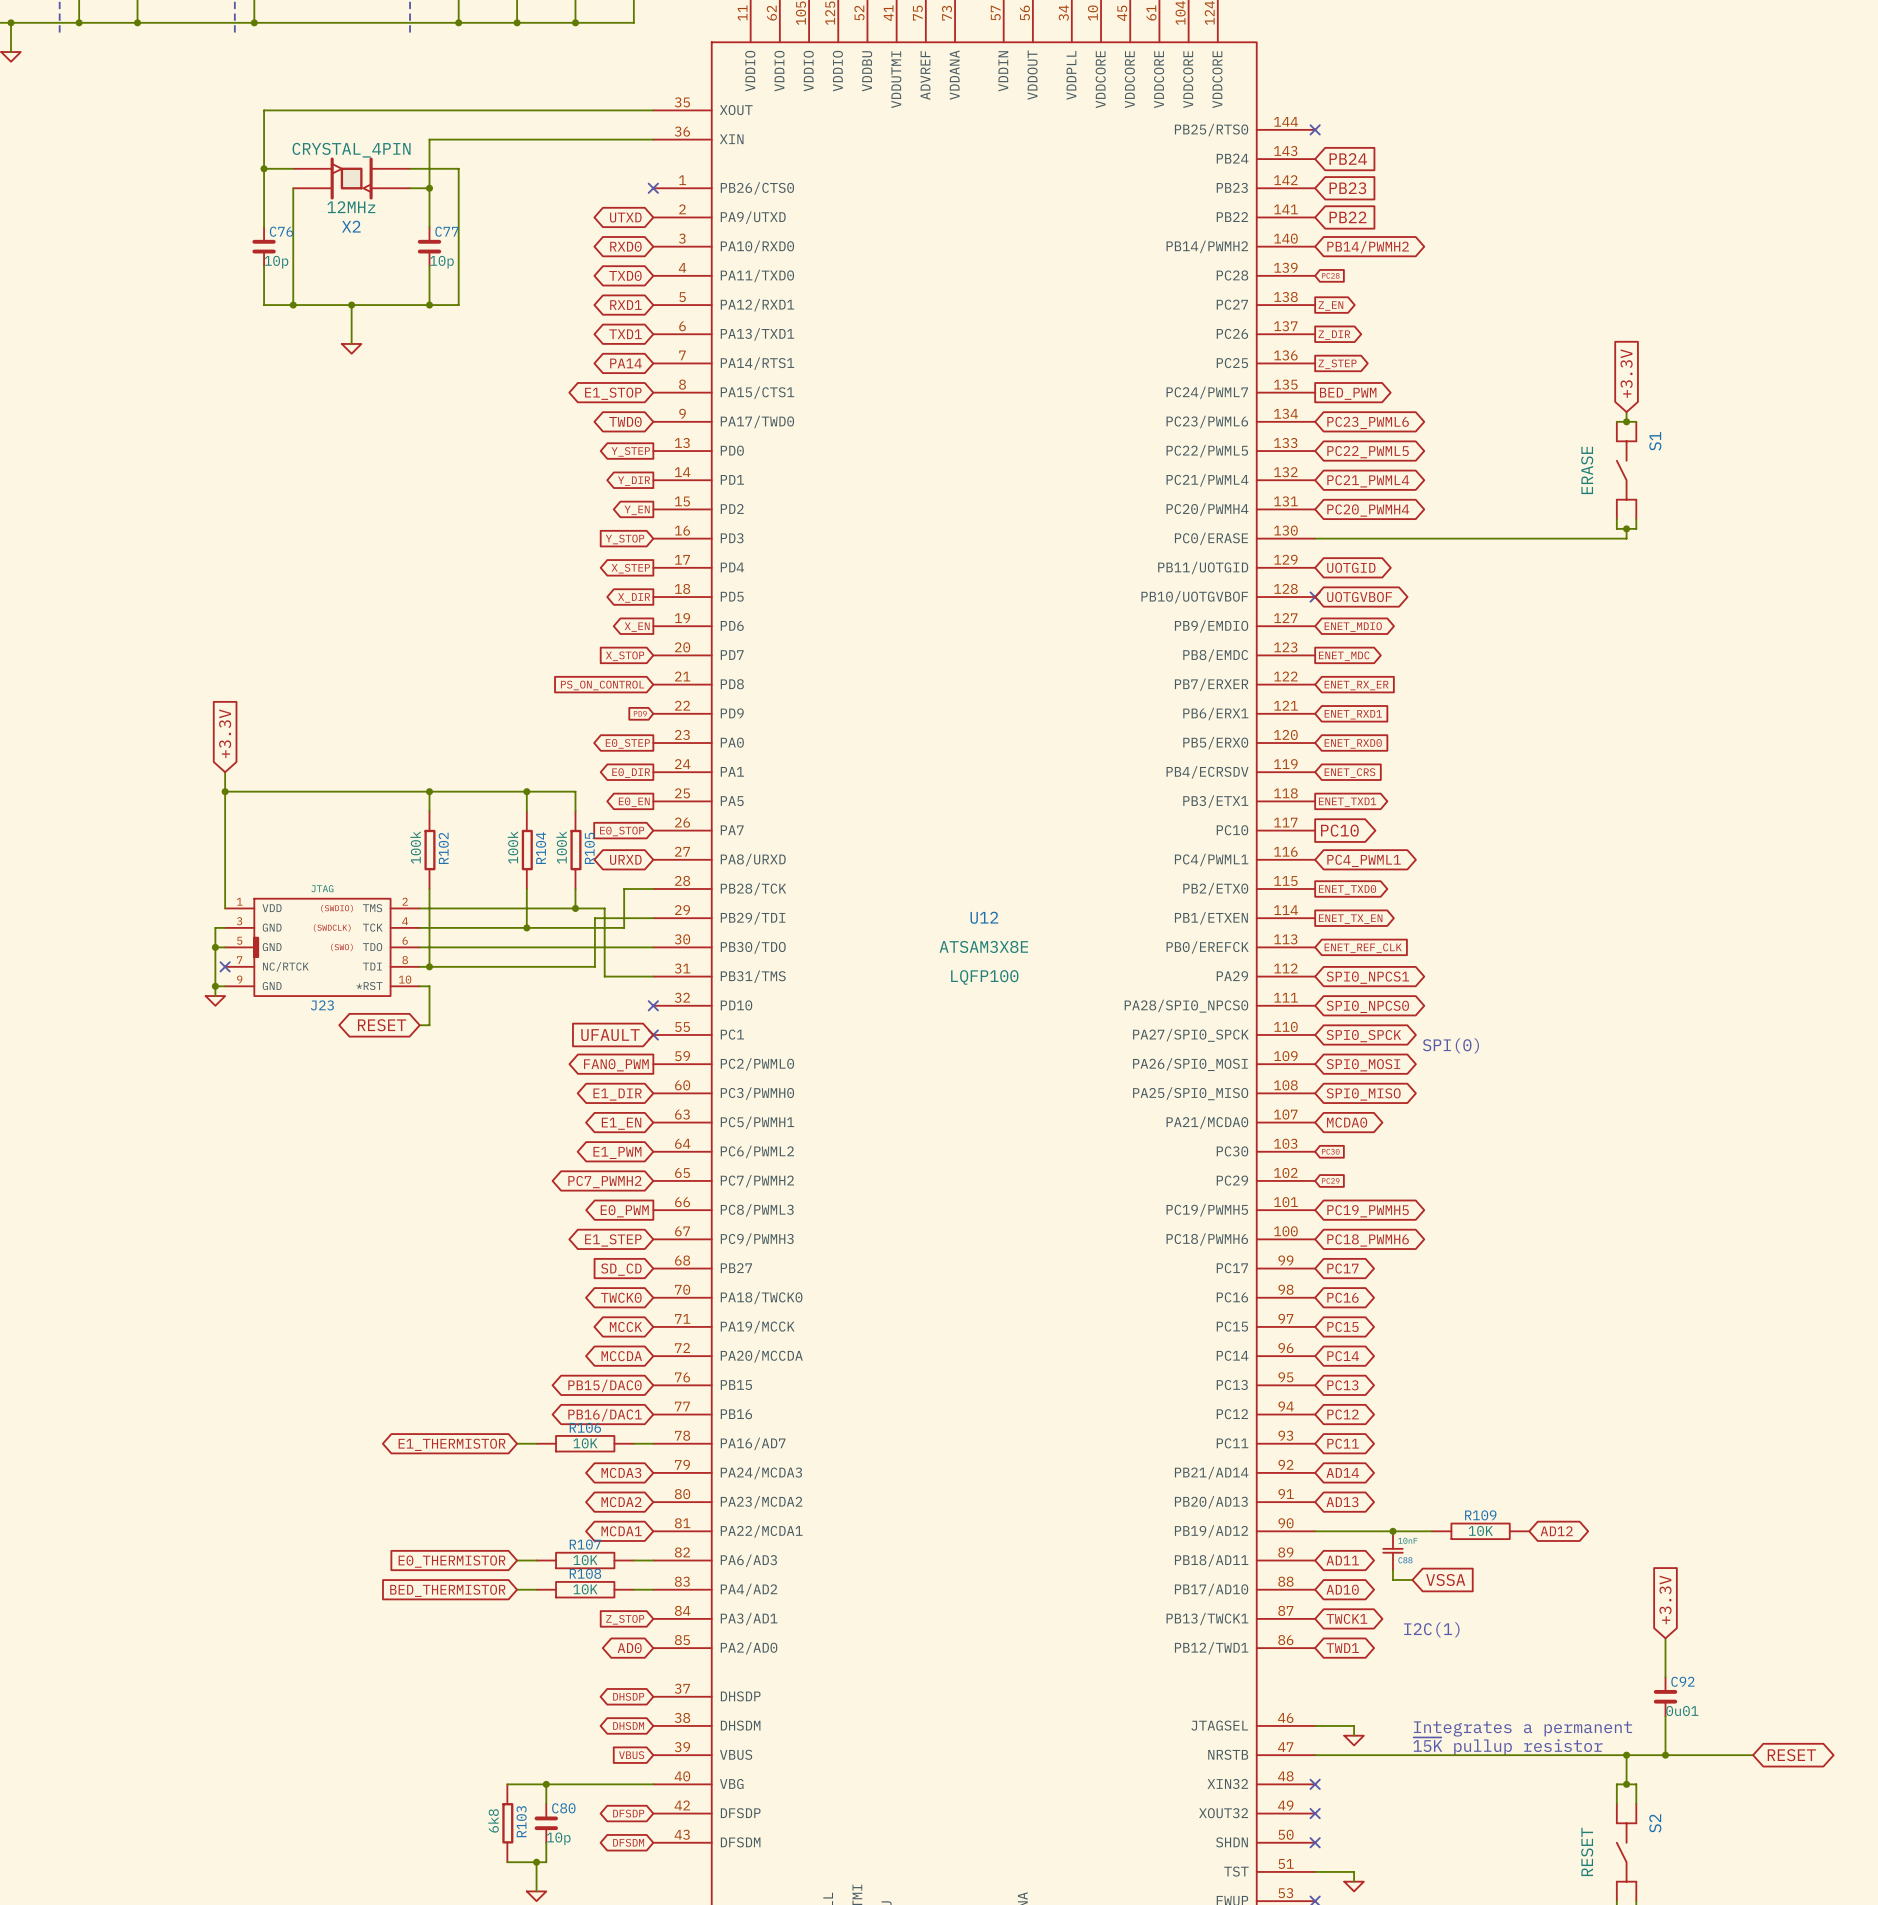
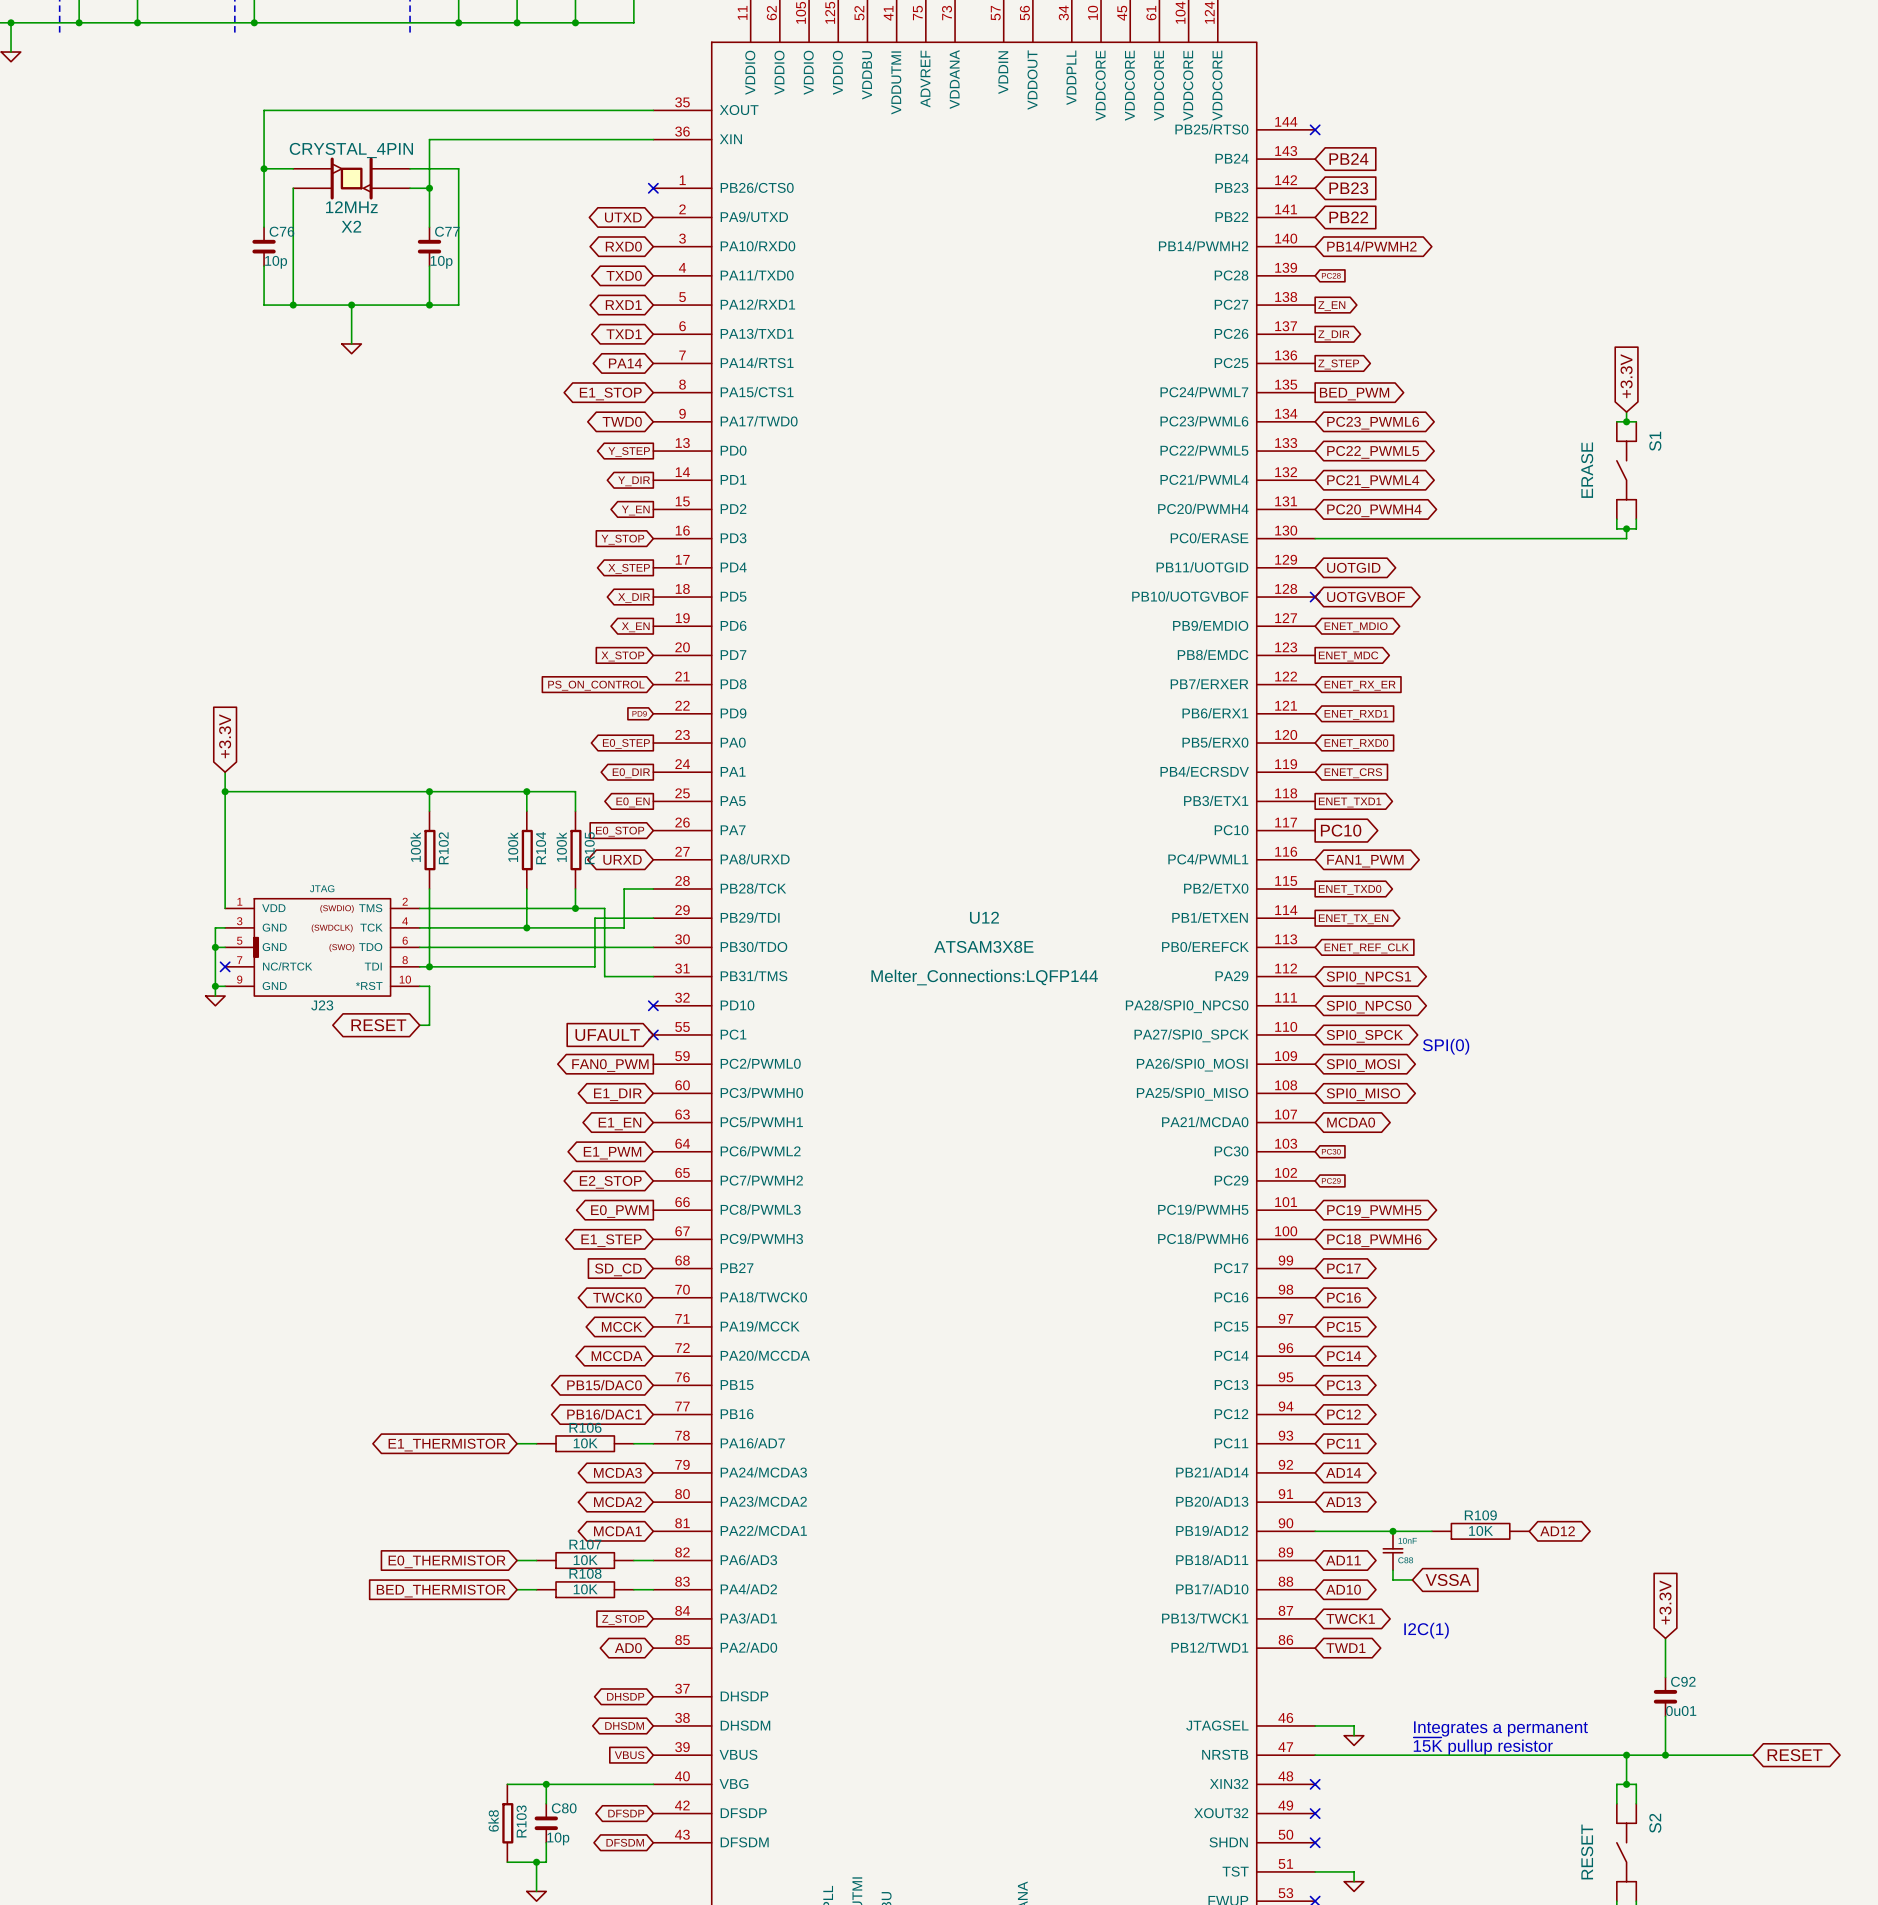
global label: PC4_PWML1 (1364, 860) -> FAN1_PWM (1365, 861)
U12 text: LQFP100 (984, 977) -> Melter_Connections:LQFP144 (984, 977)
global label: PC7_PWMH2 (604, 1182) -> E2_STOP (610, 1182)

